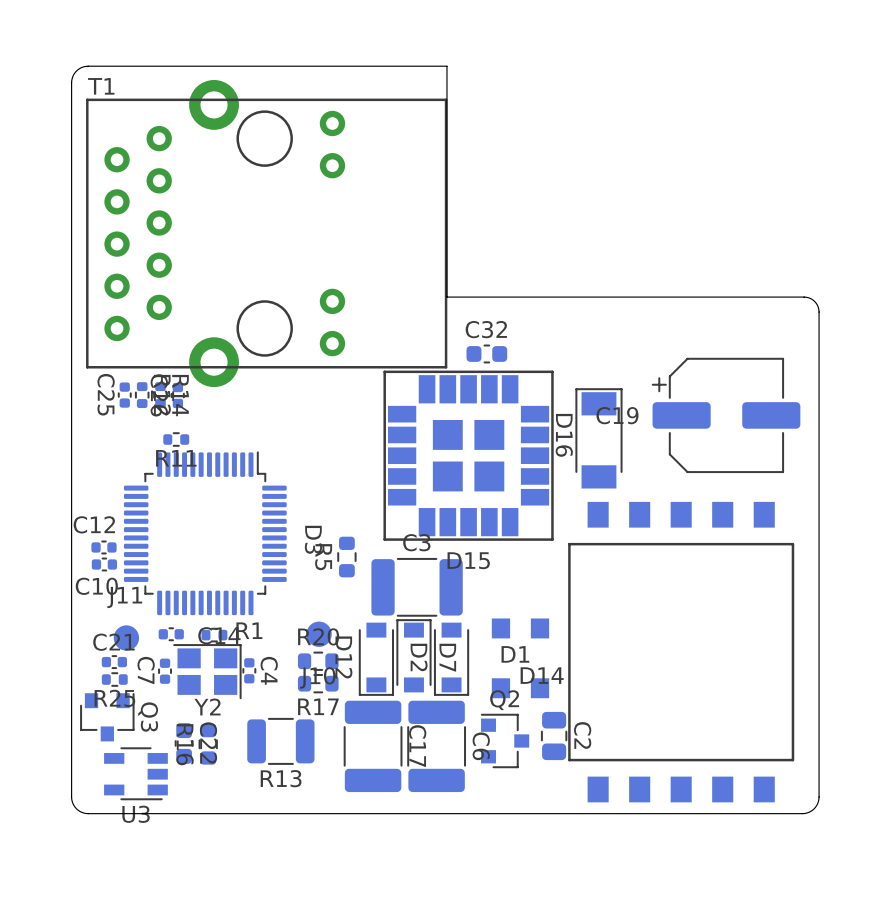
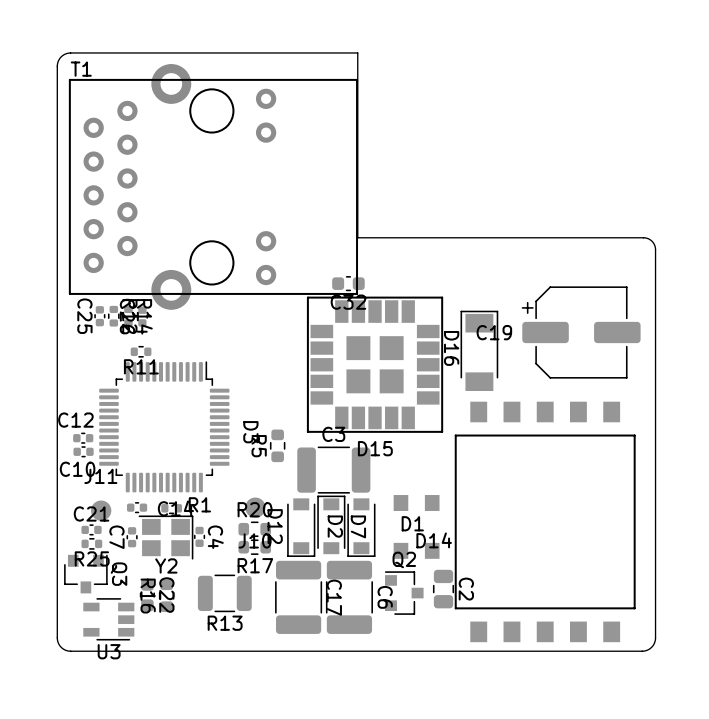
C32 name position: C32 (486, 329) -> C32 (348, 302)
C32 position: (486, 353) -> (348, 283)

